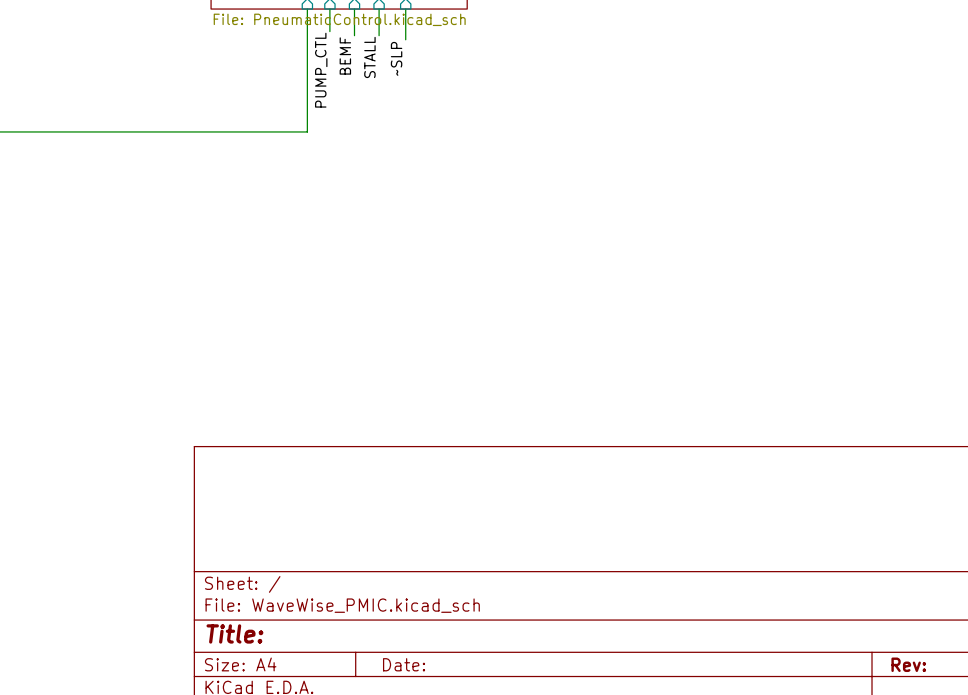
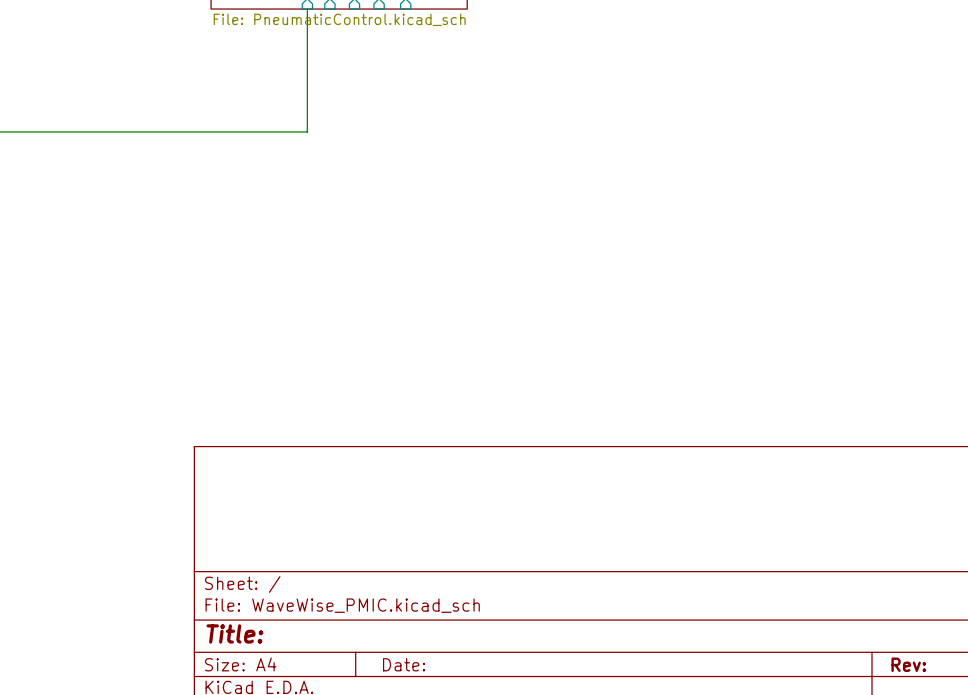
wire: (329, 9) (329, 31) -> none
wire: (354, 9) (354, 35) -> none
wire: (379, 9) (379, 35) -> none
wire: (405, 9) (405, 39) -> none
label: BEMF (345, 55) -> none
label: STALL (369, 57) -> none
label: ~SLP (396, 58) -> none
label: PUMP_CTL (321, 70) -> none

